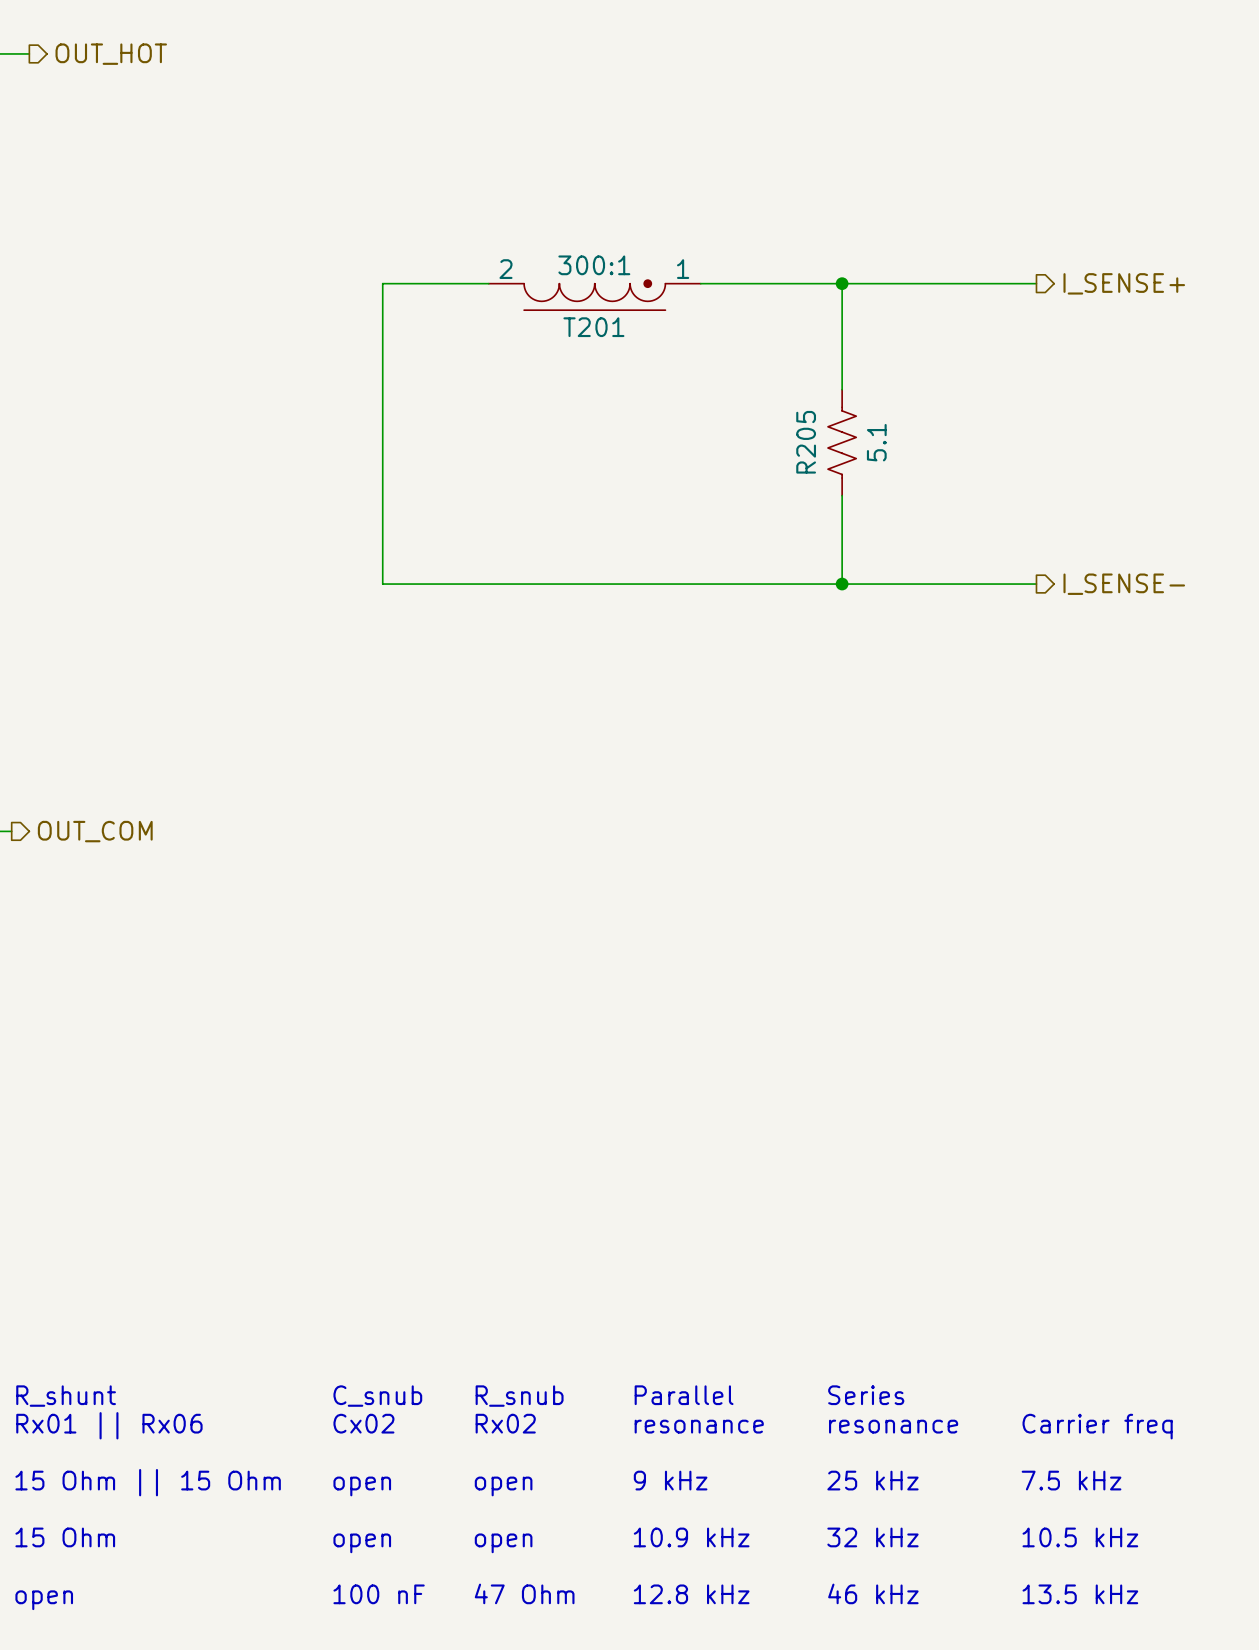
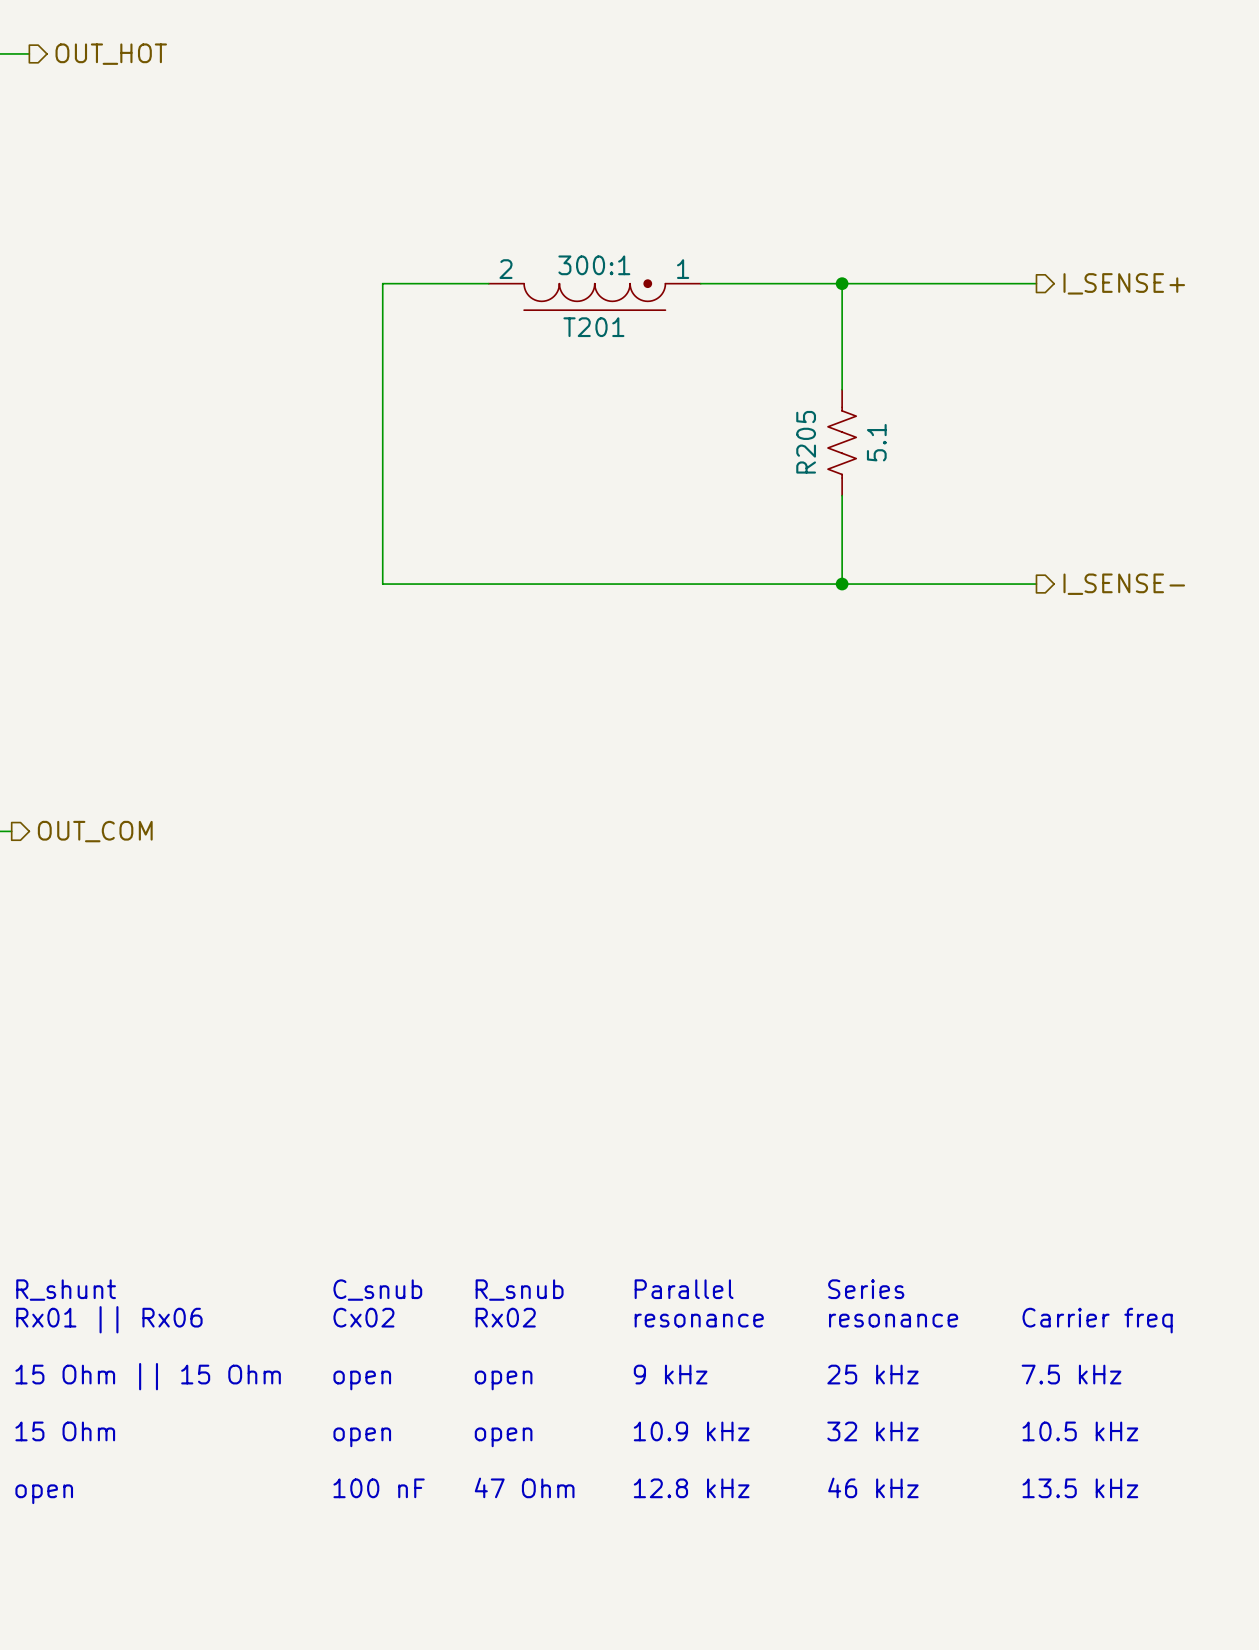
text: none -> open (362, 1380)
text: none -> open (503, 1380)
text position: Parallel (684, 1395) -> Parallel (684, 1289)
text position: Series (866, 1395) -> Series (866, 1289)
text position: R_shunt (66, 1396) -> R_shunt (66, 1290)
text position: C_snub (377, 1396) -> C_snub (377, 1290)
text position: R_snub (519, 1396) -> R_snub (519, 1290)
text position: Cx02 (363, 1423) -> Cx02 (363, 1317)
text position: Rx02 (505, 1423) -> Rx02 (505, 1317)
text position: Rx01 || Rx06 (109, 1425) -> Rx01 || Rx06 (109, 1319)
text position: resonance (699, 1426) -> resonance (699, 1320)
text position: resonance (893, 1426) -> resonance (893, 1320)
text position: Carrier freq (1097, 1426) -> Carrier freq (1097, 1320)
text position: 9 kHz (670, 1480) -> 9 kHz (670, 1374)
text position: 25 kHz (872, 1480) -> 25 kHz (872, 1374)
text position: 7.5 kHz (1071, 1480) -> 7.5 kHz (1071, 1374)
text position: 15 Ohm || 15 Ohm (148, 1482) -> 15 Ohm || 15 Ohm (148, 1376)
text position: open (362, 1486) -> open (362, 1437)
text position: open (503, 1486) -> open (503, 1437)
text position: 15 Ohm (65, 1537) -> 15 Ohm (65, 1431)
text position: 10.9 kHz (691, 1537) -> 10.9 kHz (691, 1431)
text position: 32 kHz (872, 1537) -> 32 kHz (872, 1431)
text position: 10.5 kHz (1080, 1537) -> 10.5 kHz (1080, 1431)
text: open (362, 1543) -> none
text: open (503, 1543) -> none
text position: 47 Ohm (524, 1593) -> 47 Ohm (524, 1487)
text position: 46 kHz (873, 1593) -> 46 kHz (873, 1487)
text position: 100 nF (379, 1594) -> 100 nF (379, 1488)
text position: 12.8 kHz (691, 1594) -> 12.8 kHz (691, 1488)
text position: 13.5 kHz (1080, 1594) -> 13.5 kHz (1080, 1488)
text position: open (44, 1600) -> open (44, 1494)

